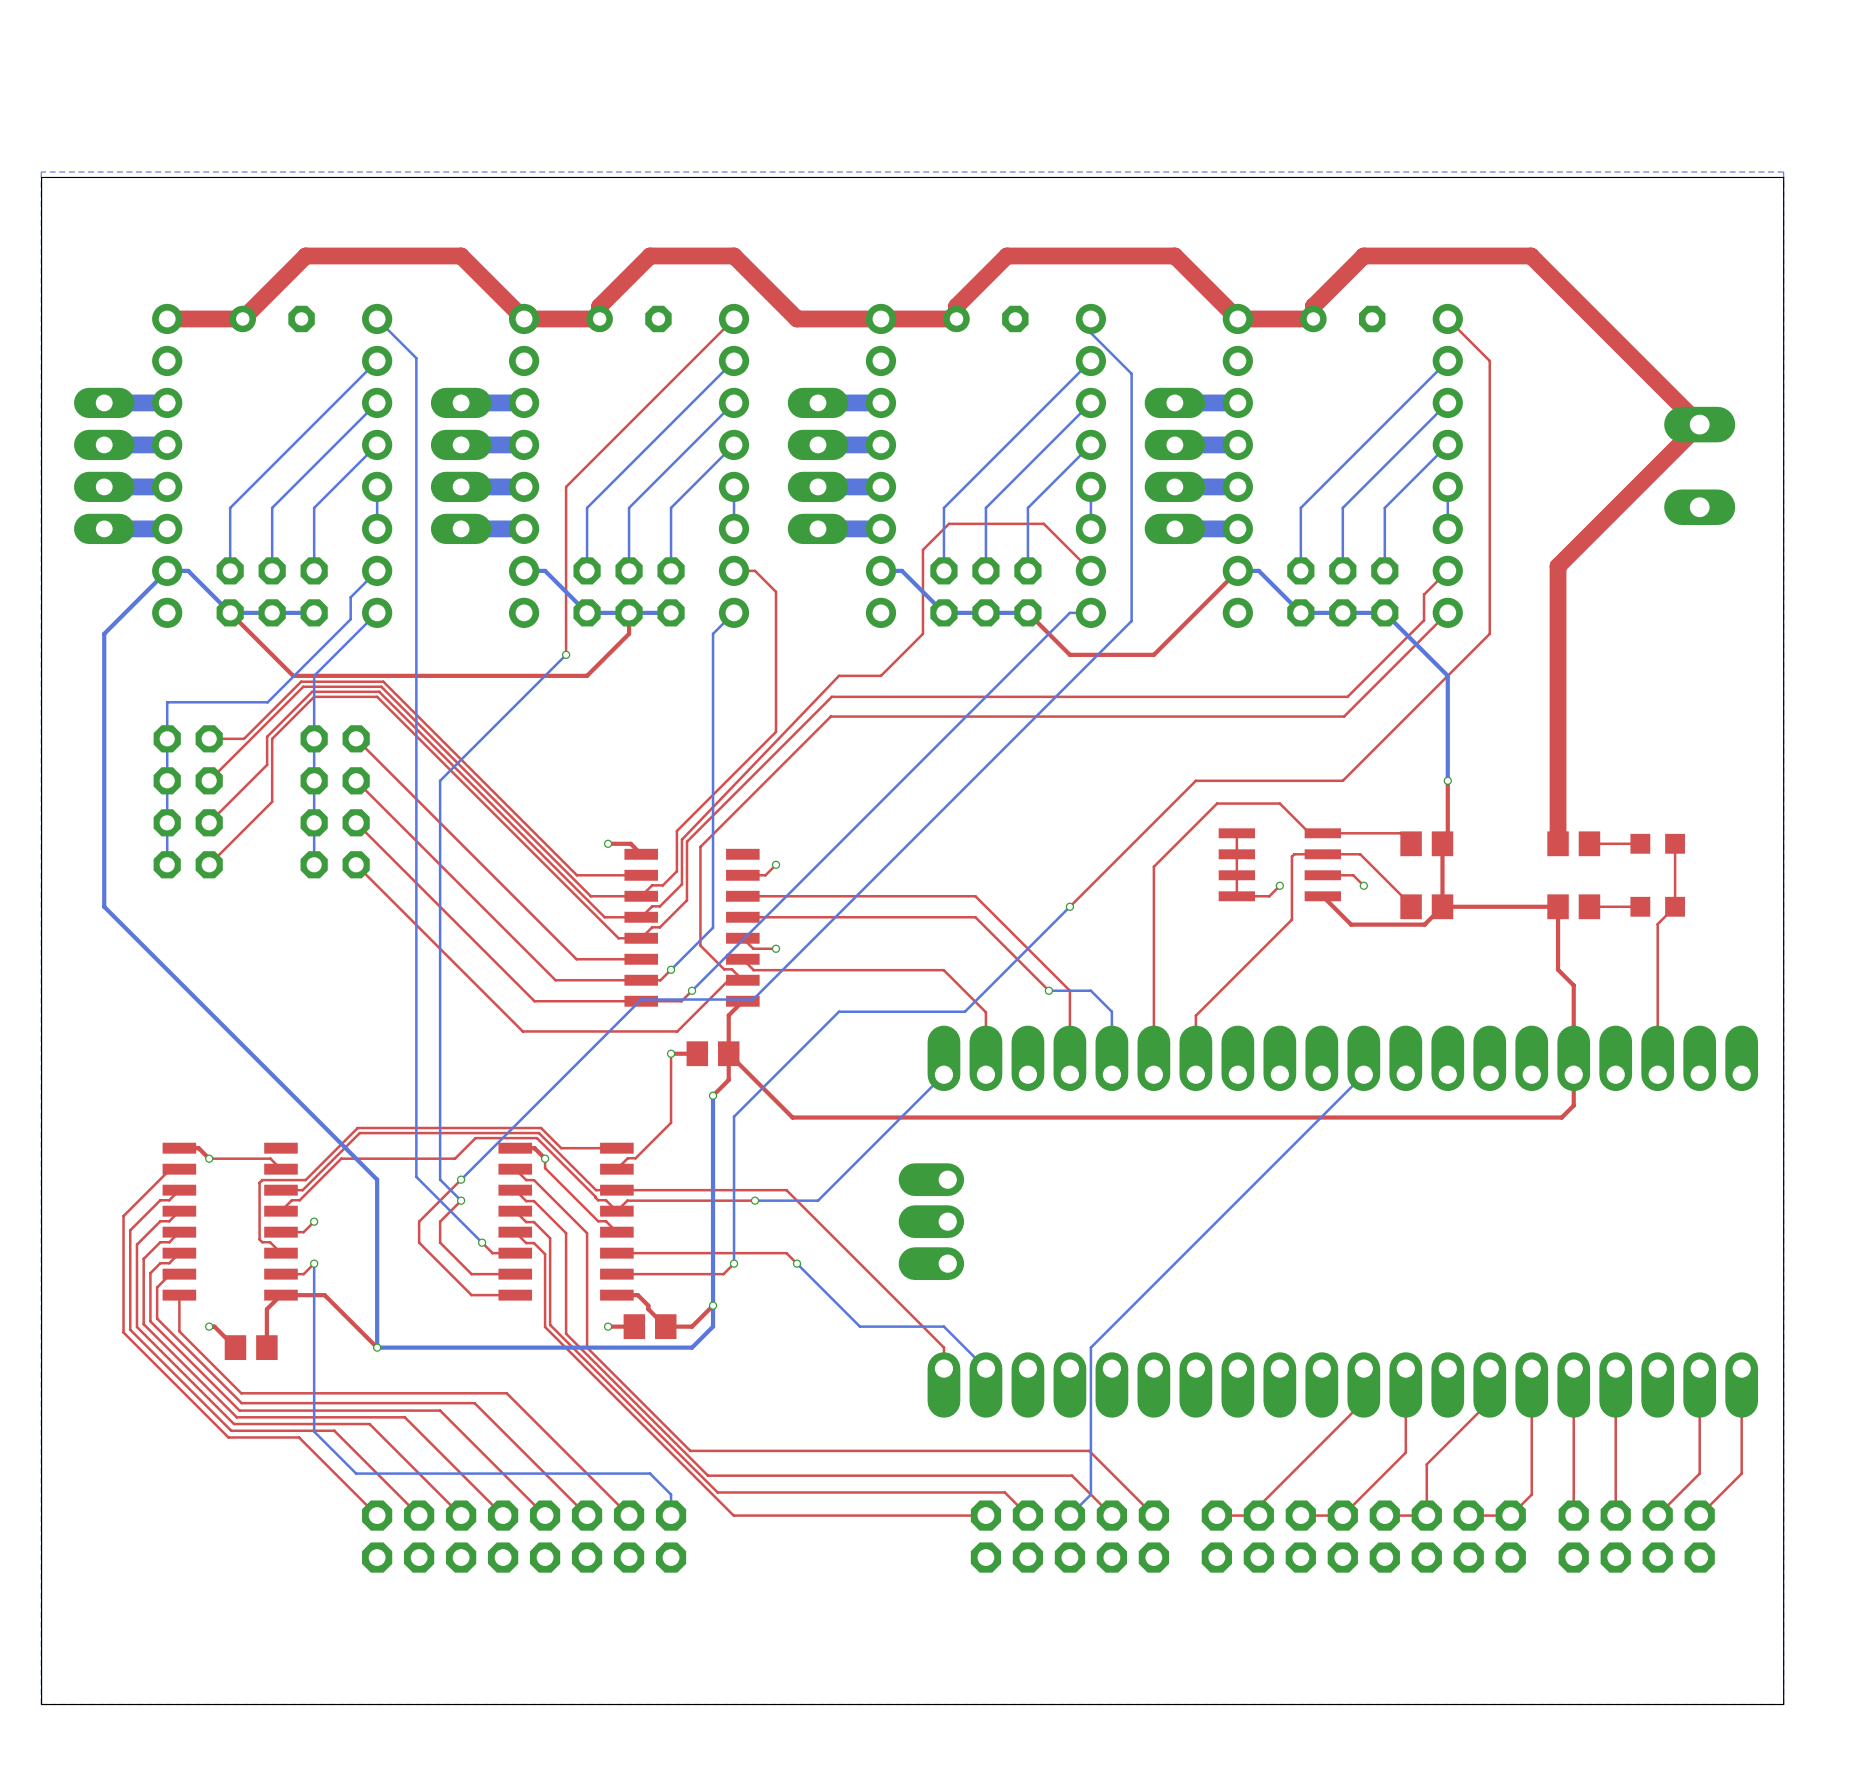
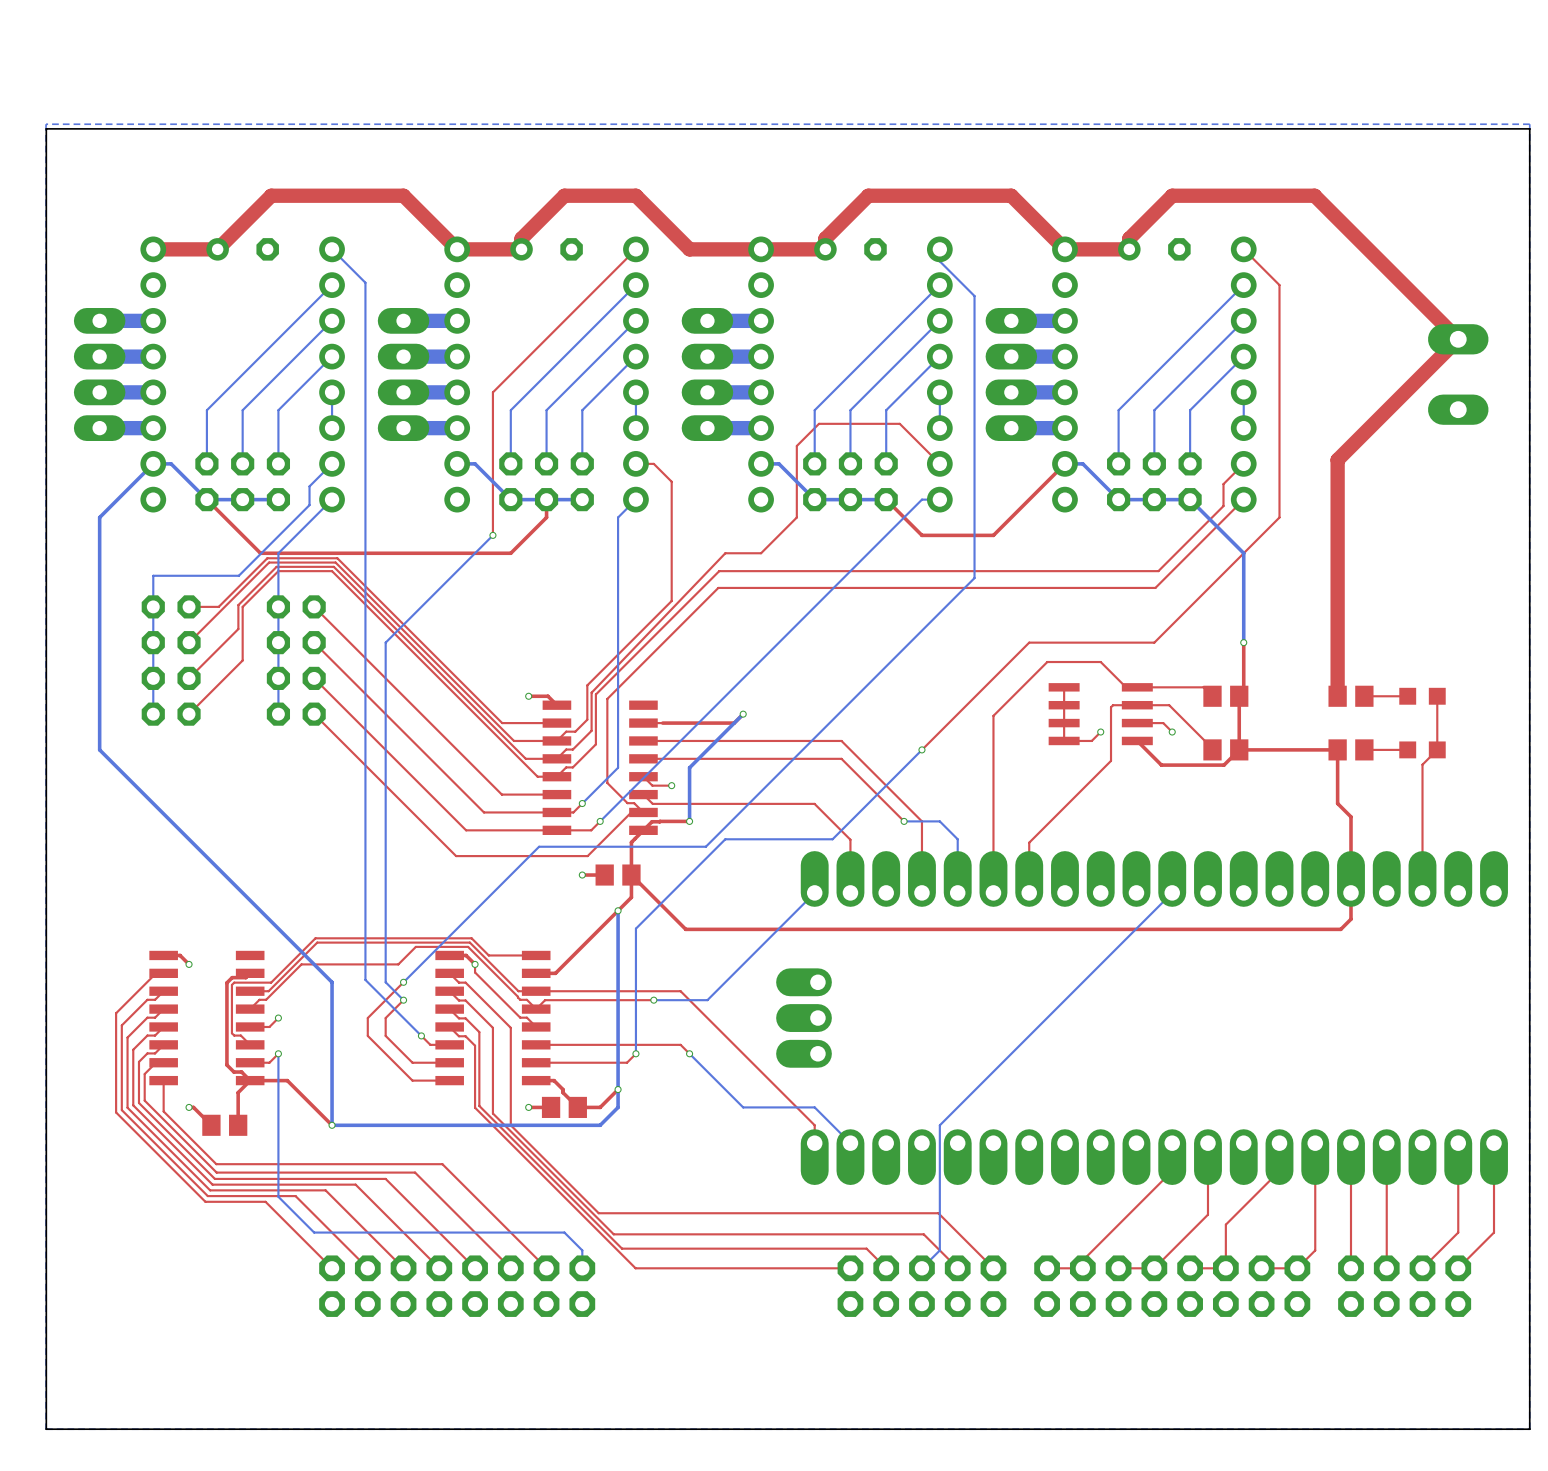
bottom track: (1131, 621) (753, 999) (641, 999) (620, 1020) -> (974, 506) (974, 578) (705, 846) (539, 846)
top track: (776, 864) (765, 875) -> (743, 714) (734, 723) (662, 723)
via: (776, 864) -> none
bottom track: none -> (743, 714) (689, 767) (689, 821)
via: none -> (743, 714)
top track: none -> (689, 821) (652, 821) (643, 830)
via: none -> (689, 821)
top track: (671, 1053) (671, 1122) (635, 1158) (627, 1158) (616, 1169) -> (618, 910) (555, 973) (536, 973)
top track: (209, 1158) (270, 1158) (280, 1169) -> (250, 1080) (241, 1072) (233, 1072) (226, 1065) (226, 982) (232, 977) (245, 977) (250, 973)

